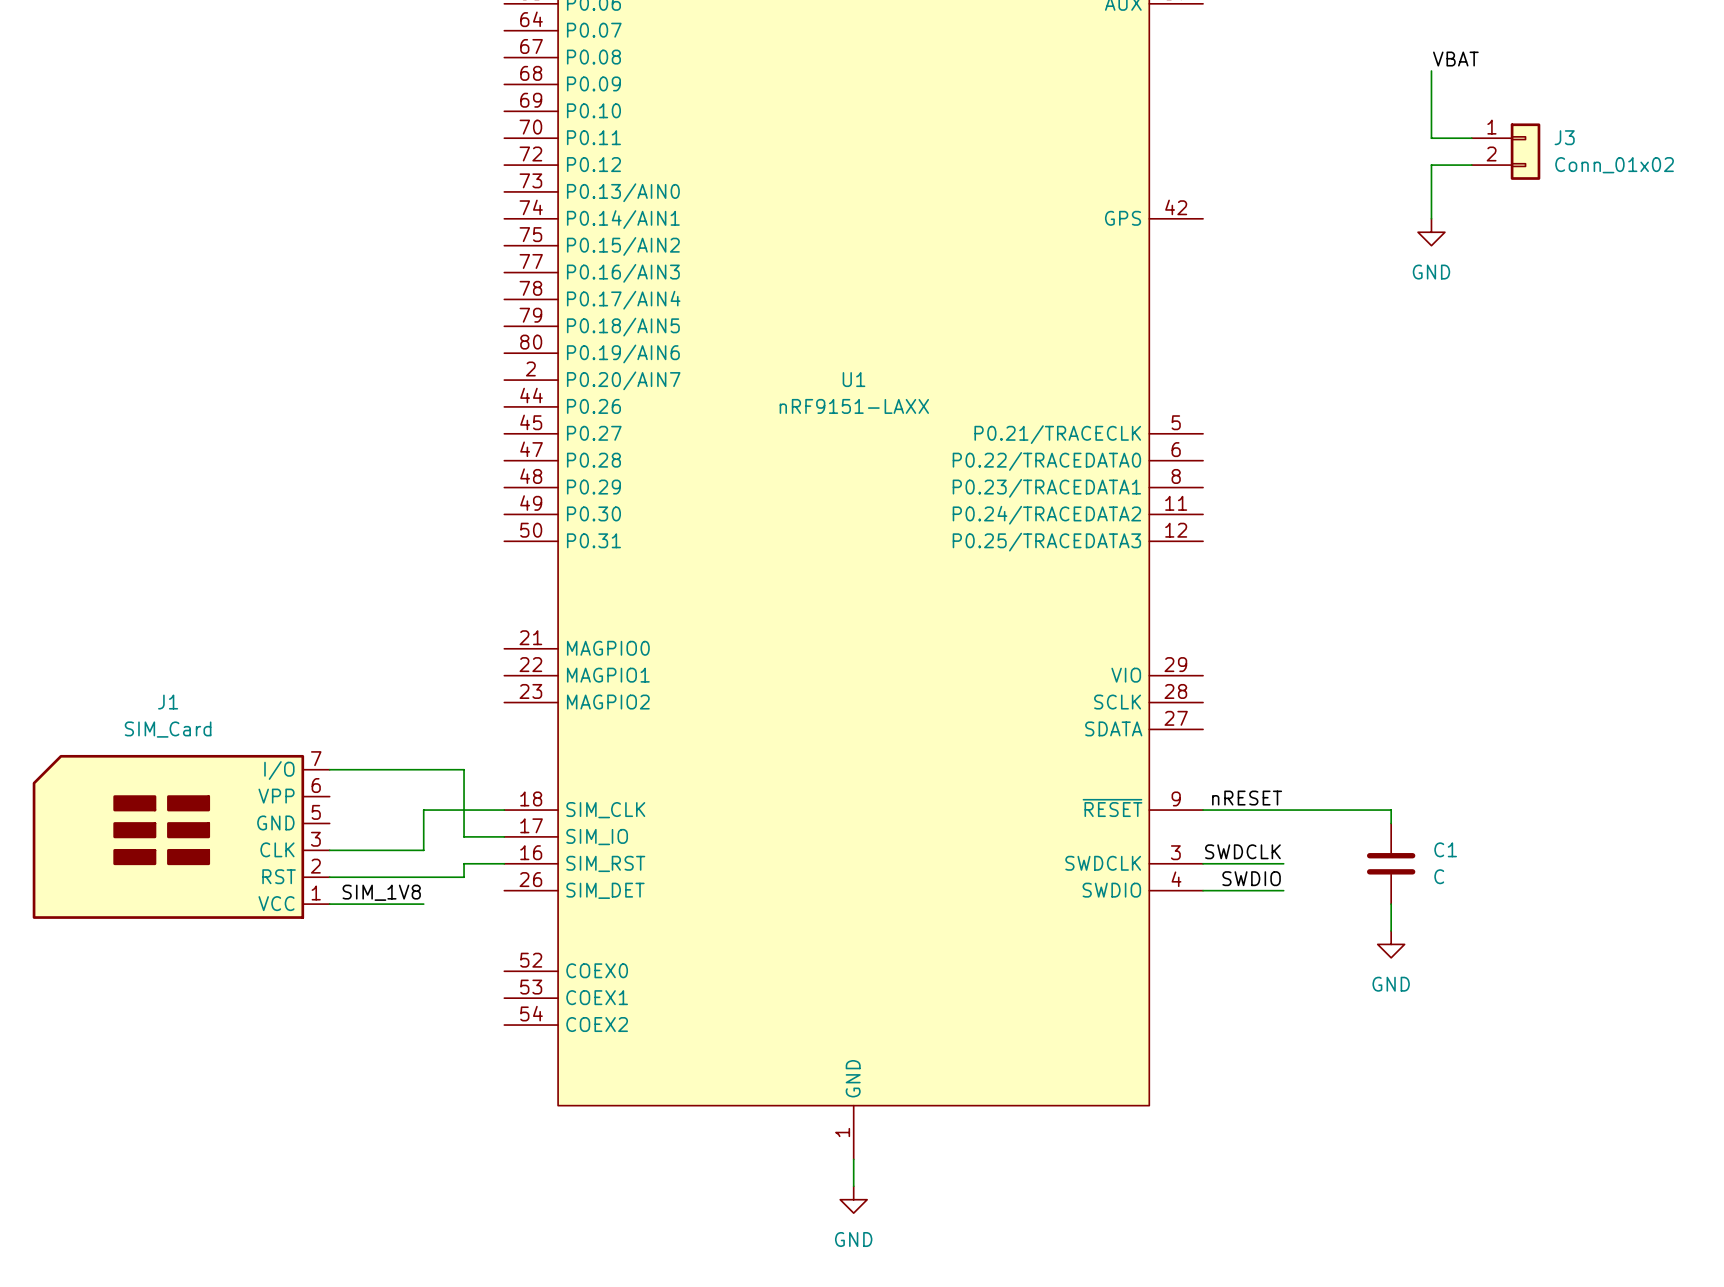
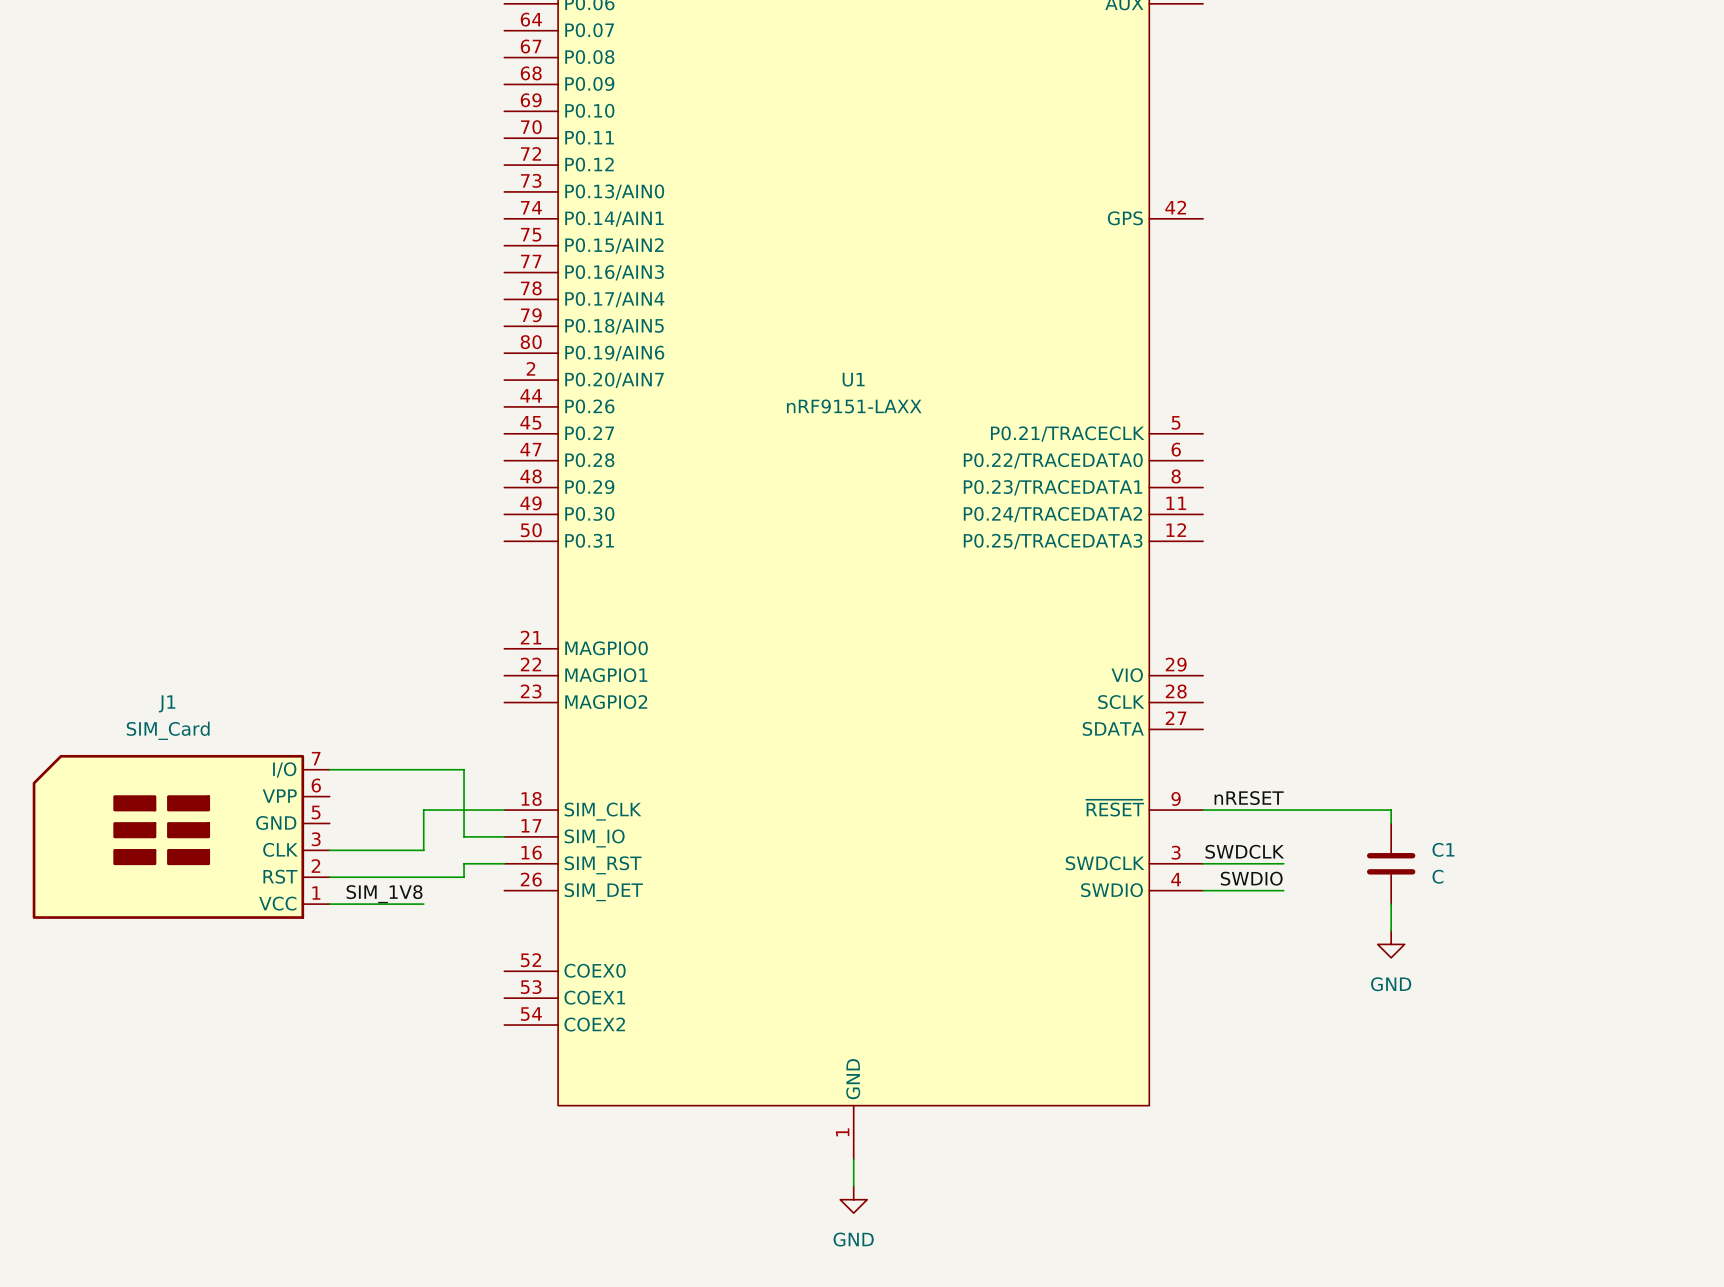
label: VBAT (1455, 59) -> none
wire: (1431, 71) (1431, 138) (1471, 138) -> none
J3: Conn_01x02 (1506, 151) -> none
wire: (1471, 165) (1431, 165) (1431, 218) -> none
power symbol: GND (1431, 232) -> none

